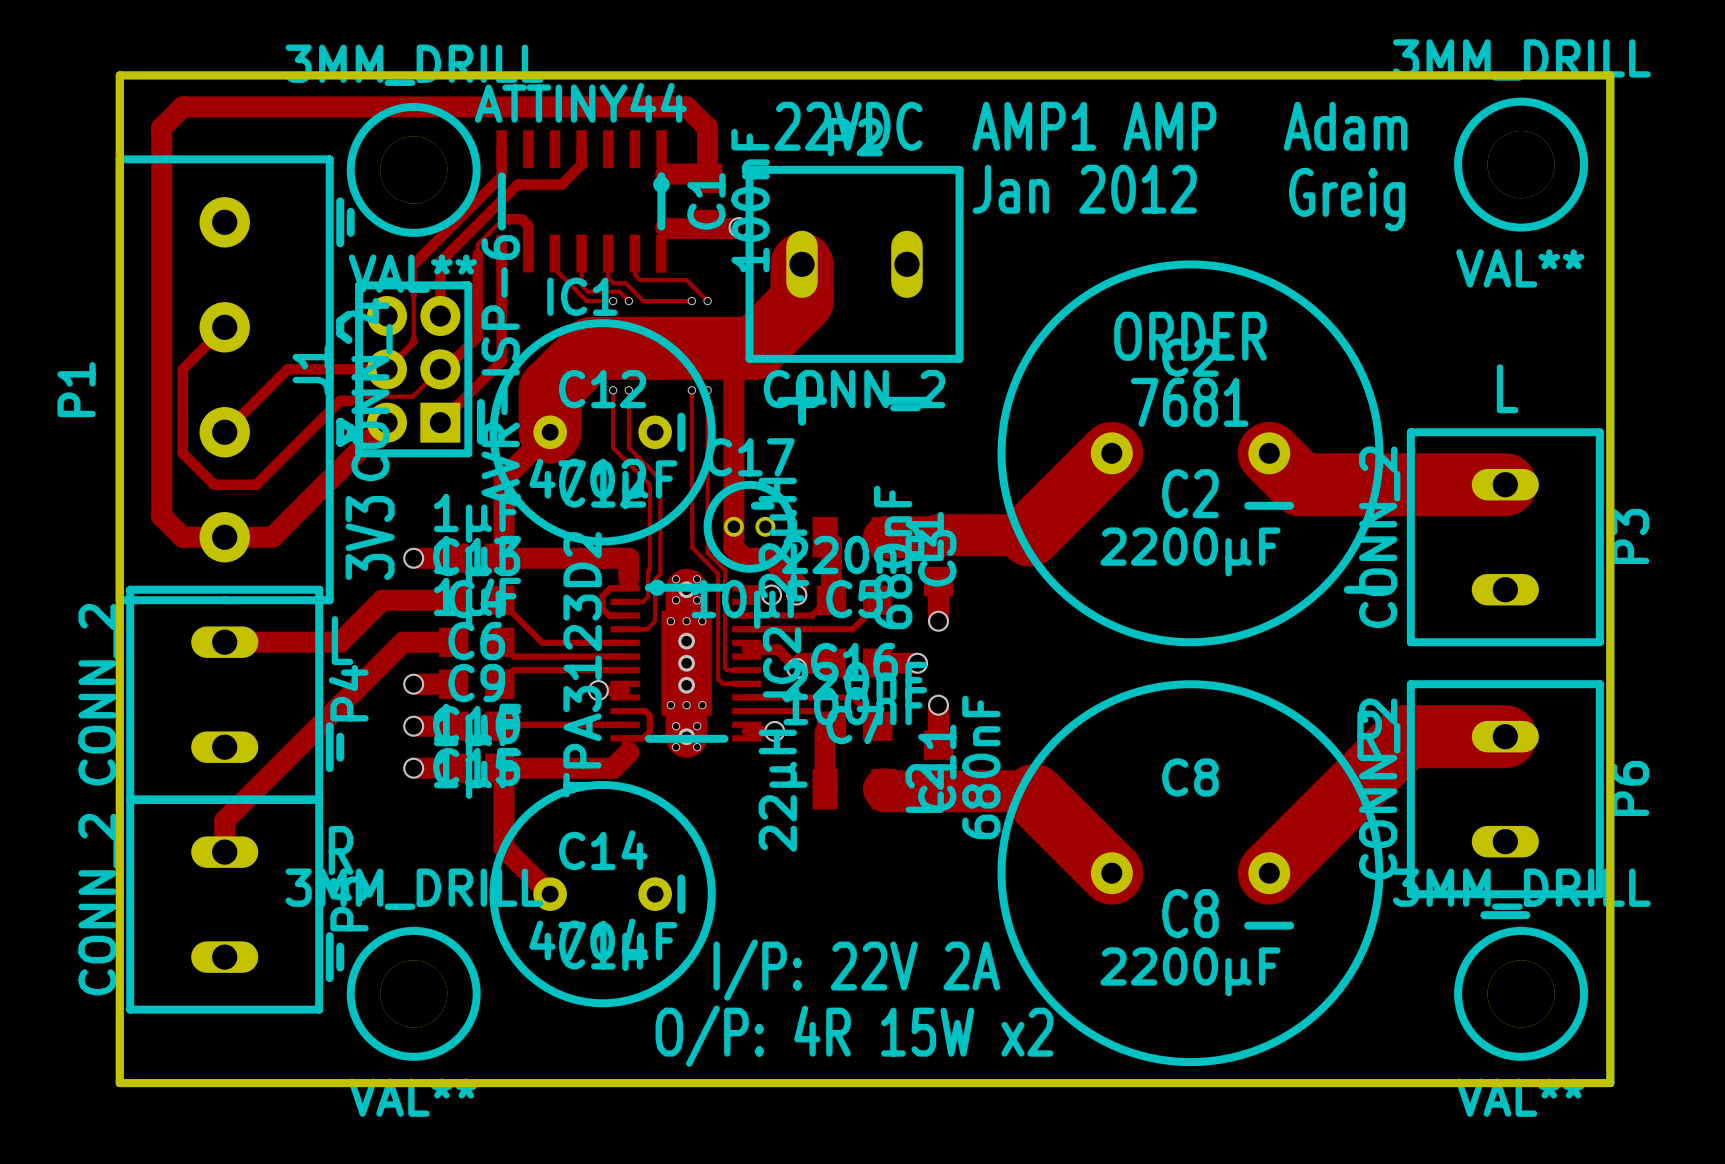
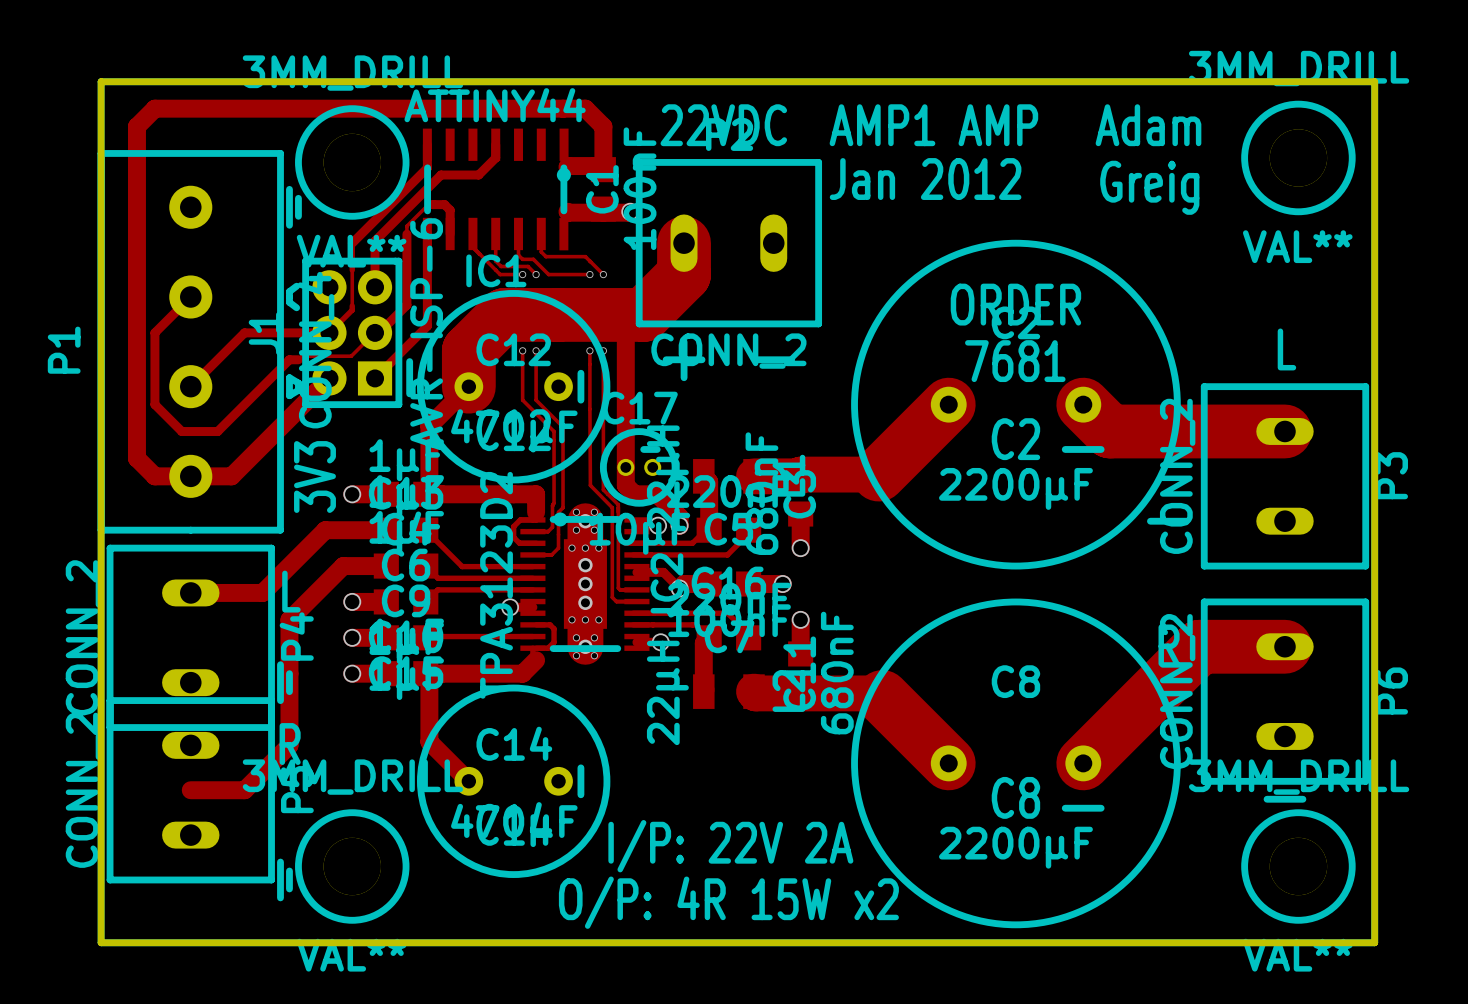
text position: L (342, 640) -> L (291, 591)
track: (224, 642) (340, 642) -> (190, 592) (262, 592) (289, 566)
P4 position: (224, 694) -> (190, 637)
track: (340, 705) (224, 820) (224, 852) -> (289, 619) (289, 745) (244, 790) (190, 790)
line: (329, 726) (329, 757) -> (280, 673) (280, 700)
line: (340, 736) (340, 757) -> (289, 673) (289, 691)
line: (329, 936) (329, 978) -> (280, 862) (280, 897)
line: (340, 946) (340, 967) -> (289, 871) (289, 888)

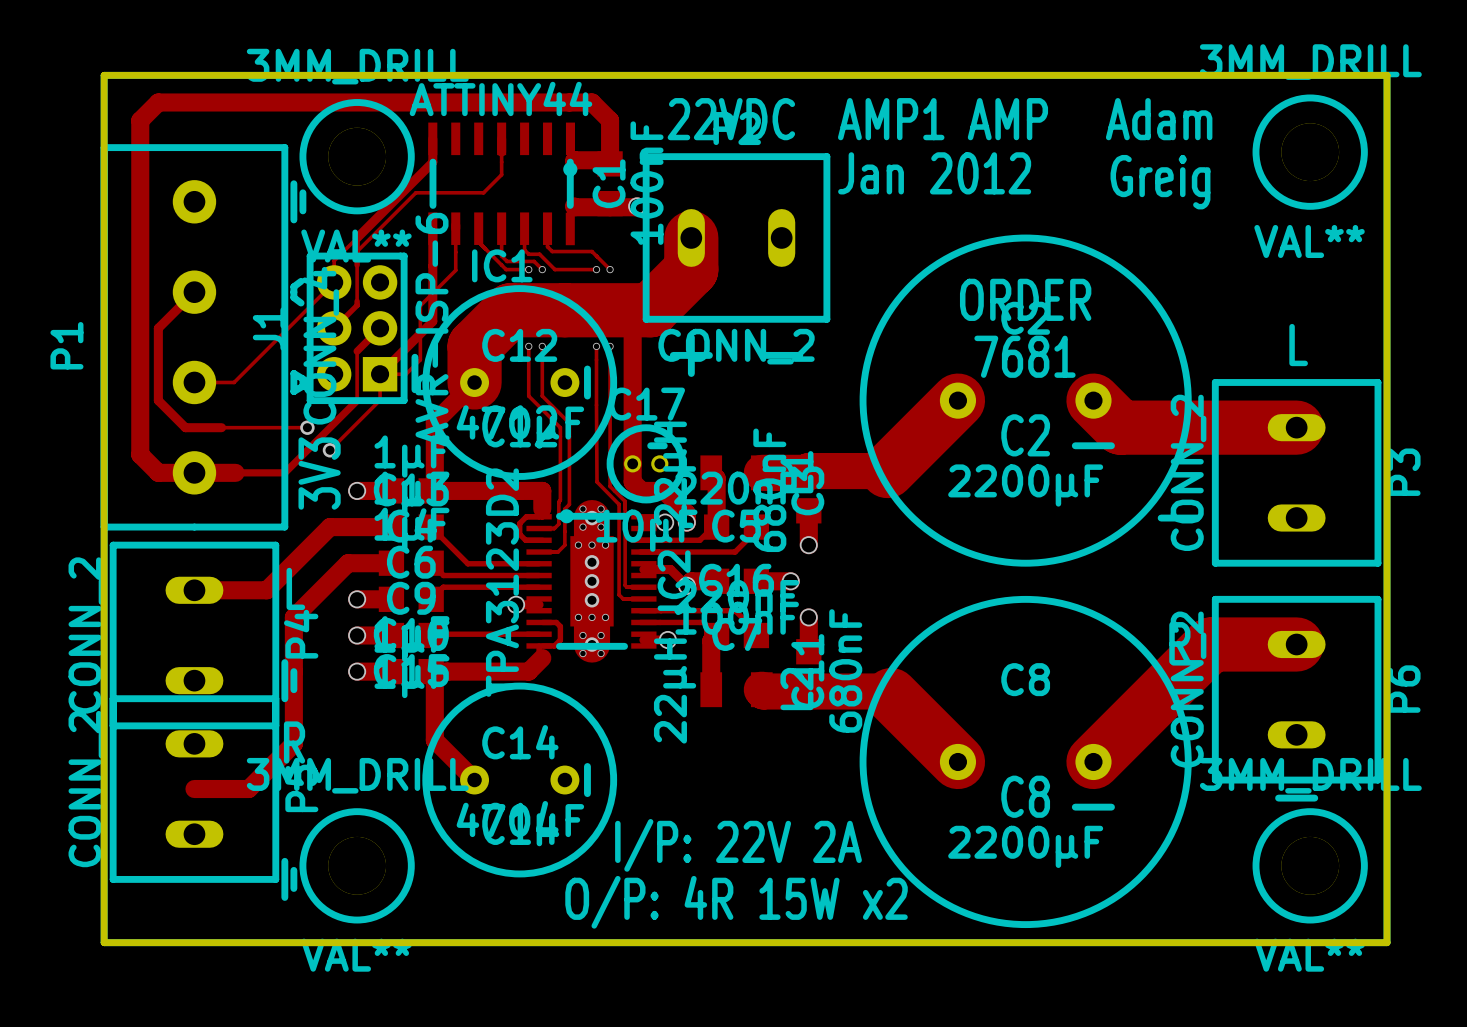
track: (495, 157) (478, 175) (441, 175) (375, 241) (375, 287) -> (501, 152) (501, 174) (483, 192) (415, 192) (357, 251)
track: (432, 204) (444, 204) (450, 210) (450, 230) -> none
track: (433, 204) (428, 204) (406, 226) (406, 305) (379, 332) (374, 332) (351, 356) (302, 356) (298, 359) (289, 359) (217, 431) -> (307, 427) (221, 427)
track: none -> (455, 228) (455, 270) (420, 305) (420, 359) (406, 374) (380, 374) (380, 400) (329, 450)
track: (329, 332) (244, 332) (190, 386) -> (357, 237) (334, 260) (334, 282) (234, 382) (194, 382)
track: (329, 378) (231, 476) -> (380, 328) (357, 351) (357, 400) (284, 472) (235, 472)
via: none -> (307, 427)
via: none -> (329, 450)

